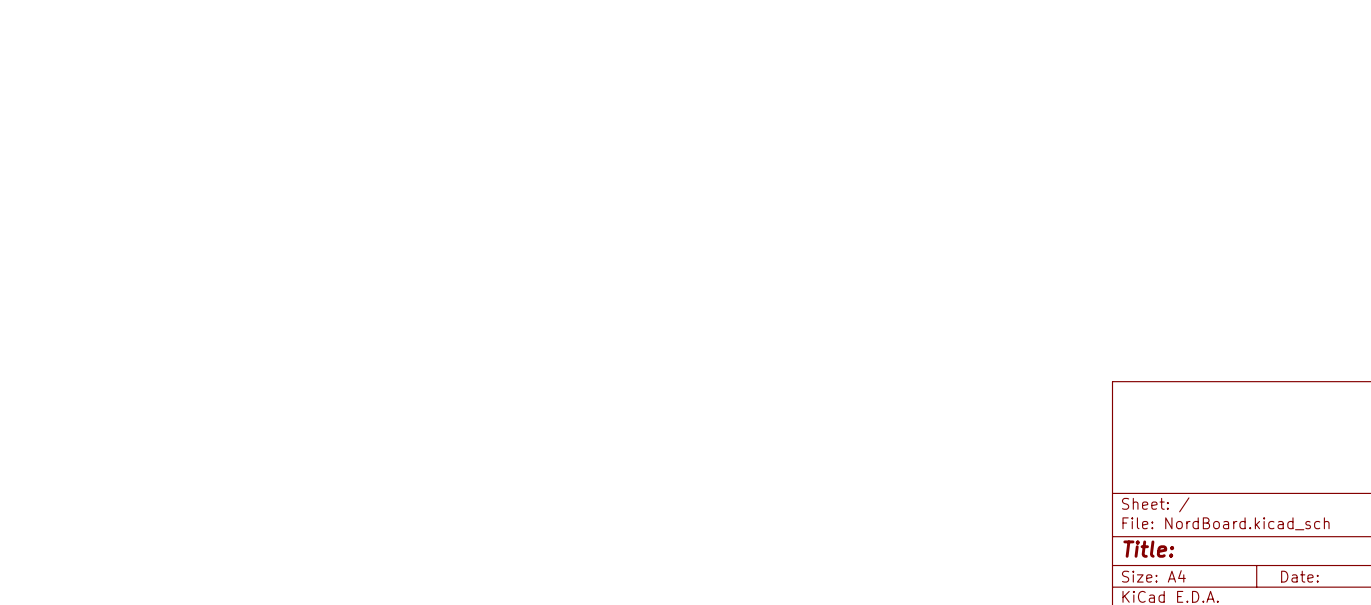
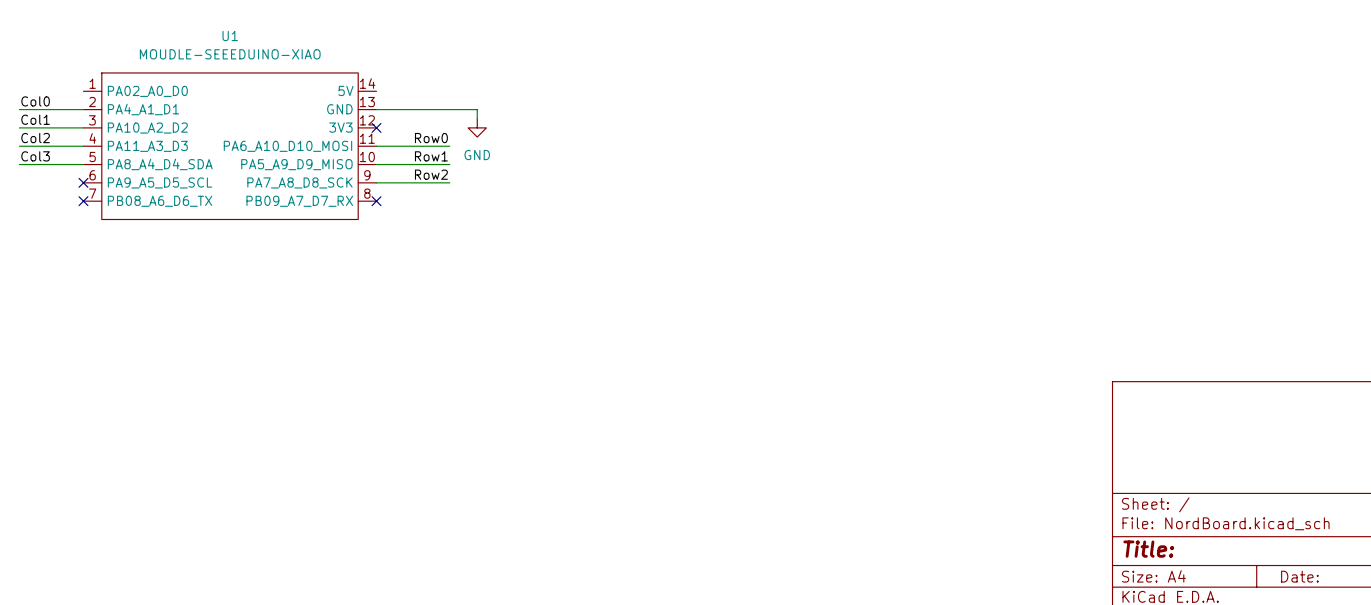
label: none -> Col0 (35, 101)
wire: none -> (19, 109) (83, 109)
wire: none -> (376, 109) (477, 109) (477, 118)
label: none -> Col1 (35, 119)
wire: none -> (19, 127) (83, 127)
no-connect mark: none -> (376, 127)
power symbol: none -> GND (477, 127)
label: none -> Col2 (35, 138)
label: none -> Row0 (431, 138)
wire: none -> (19, 146) (83, 146)
U1: none -> MOUDLE-SEEEDUINO-XIAO (230, 146)
wire: none -> (376, 146) (449, 146)
label: none -> Col3 (35, 156)
label: none -> Row1 (431, 156)
wire: none -> (19, 164) (83, 164)
wire: none -> (376, 164) (449, 164)
label: none -> Row2 (431, 174)
no-connect mark: none -> (83, 182)
wire: none -> (376, 182) (449, 182)
no-connect mark: none -> (83, 201)
no-connect mark: none -> (376, 201)

